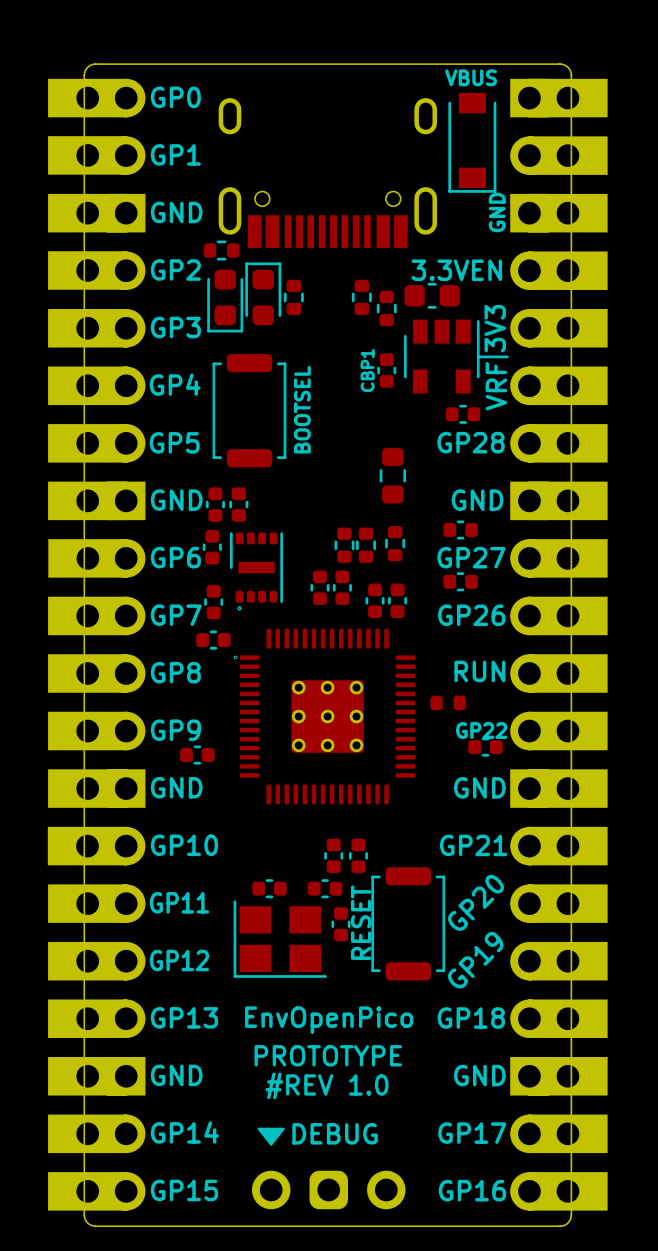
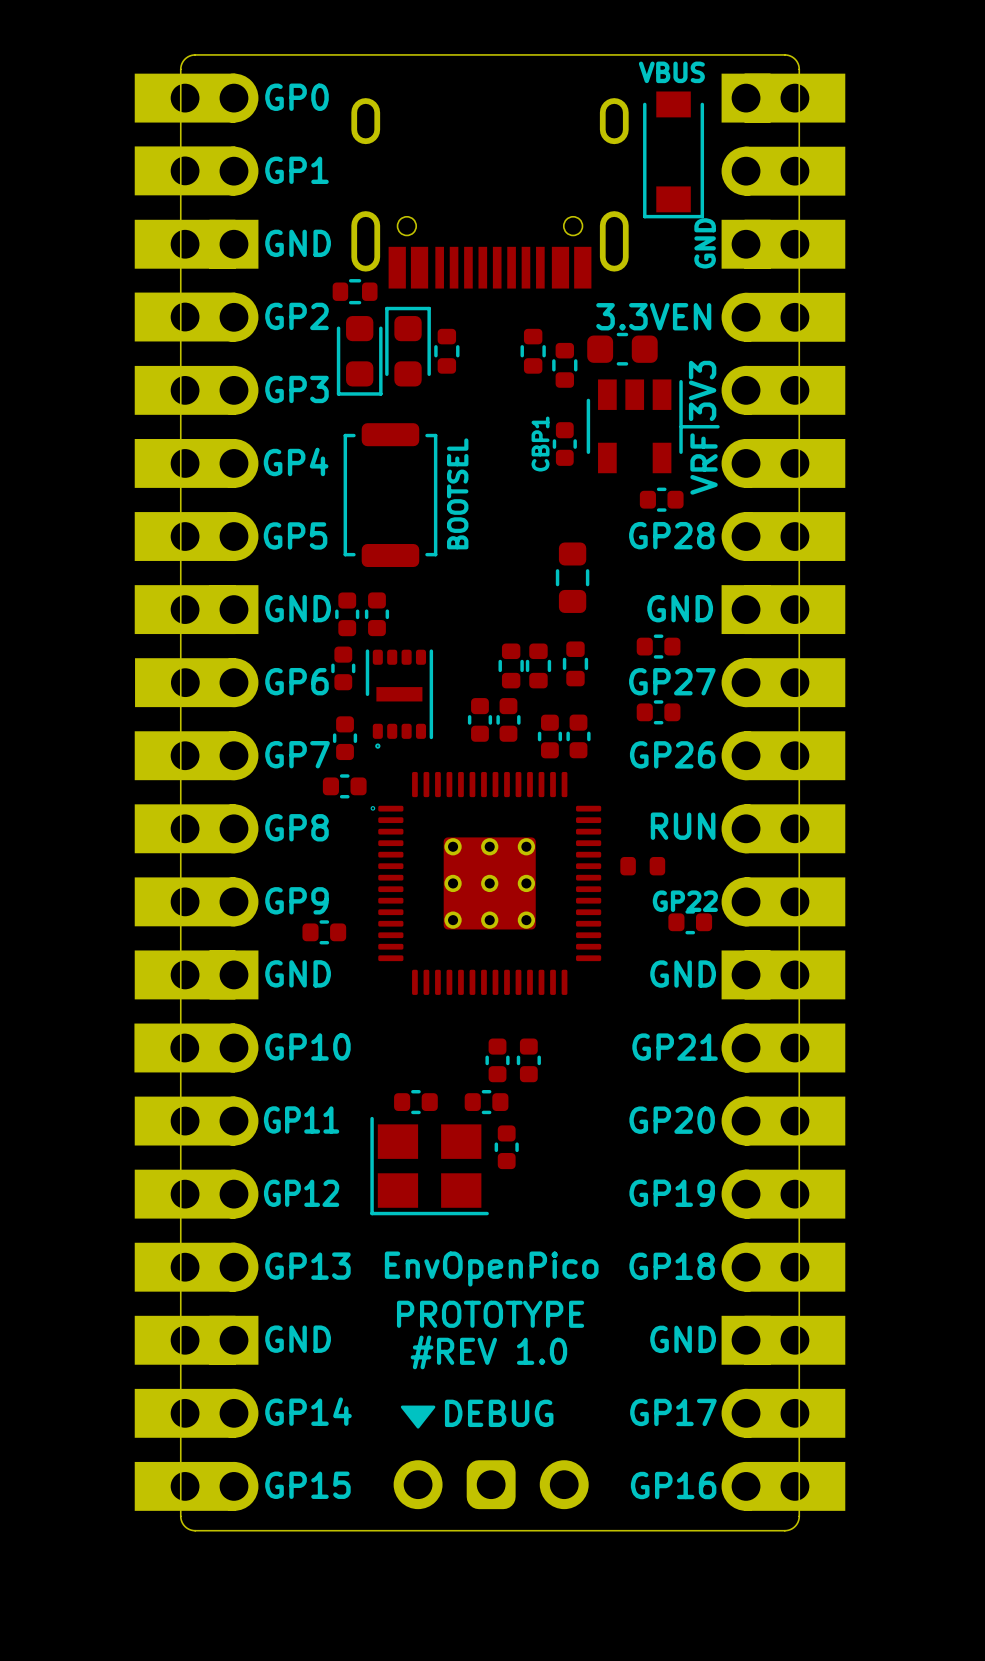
text rotation: 0° (476, 902) -> 45° clockwise (672, 1120)
text: RESET (361, 922) -> none
part: (408, 923) -> none
text rotation: 0° (475, 960) -> 45° clockwise (672, 1193)

